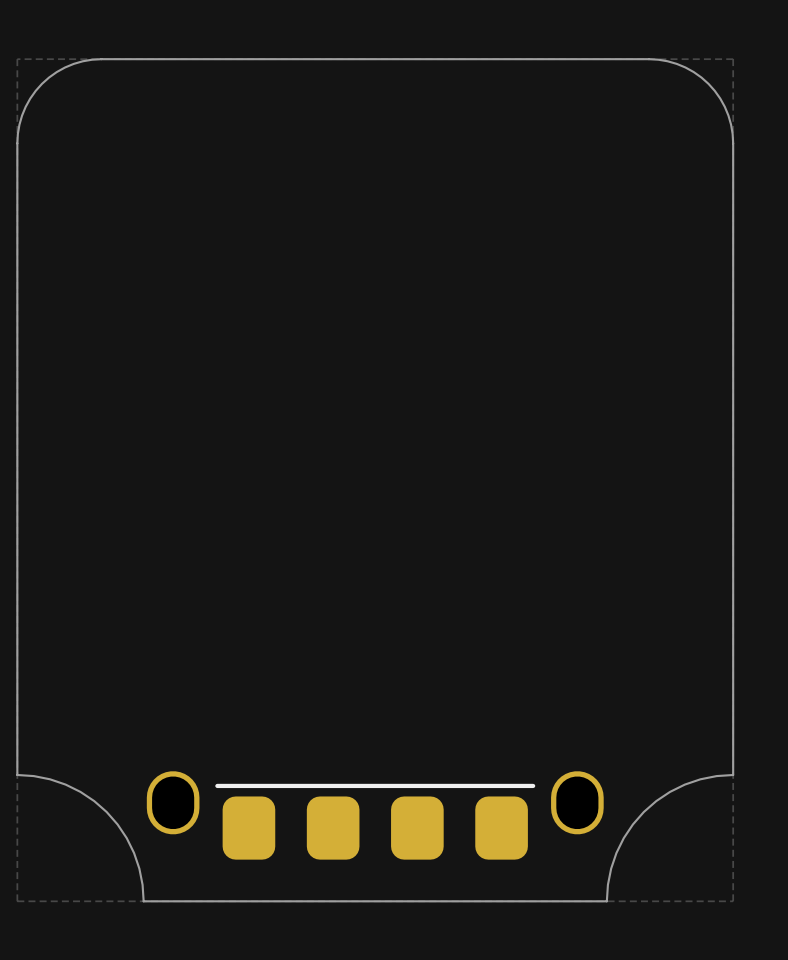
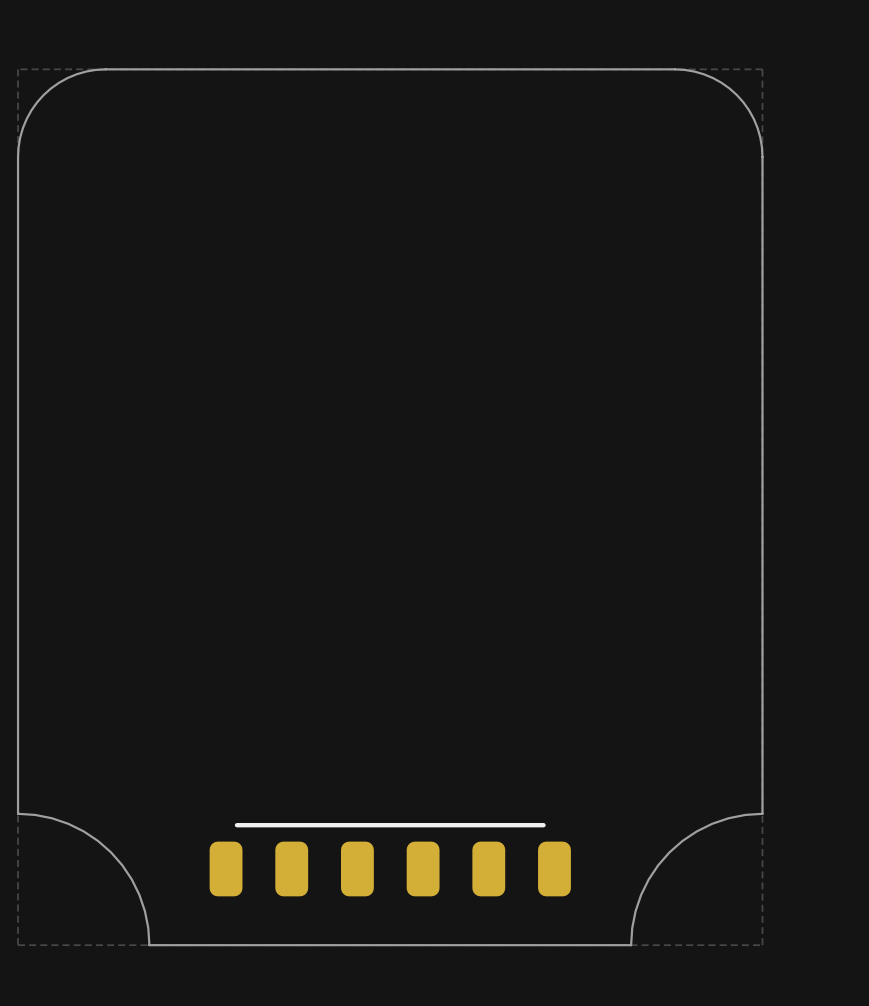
part footprint: [146, 771, 604, 860] -> [209, 823, 571, 897]

